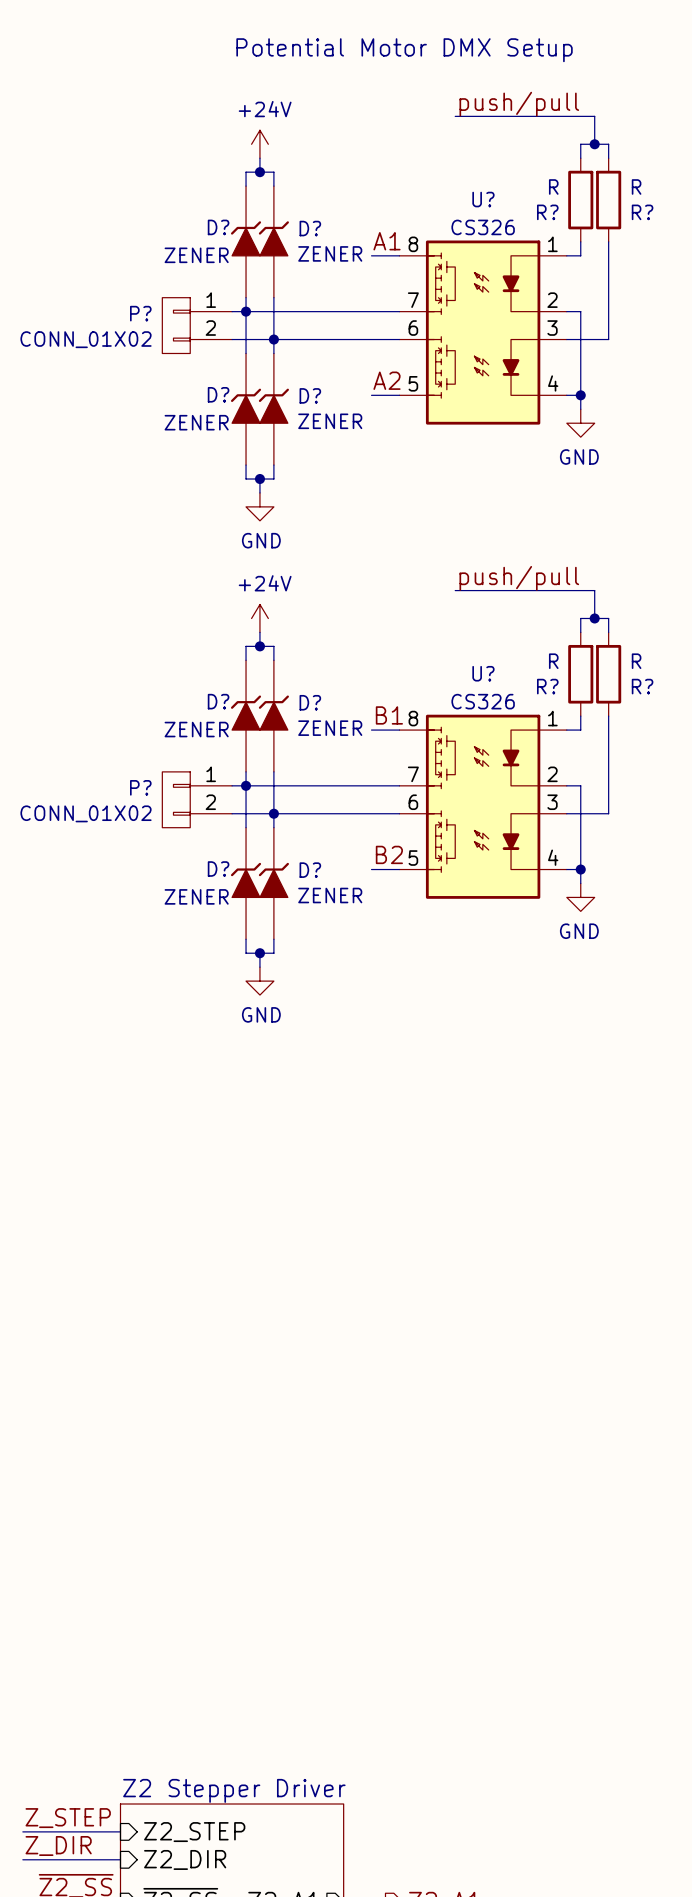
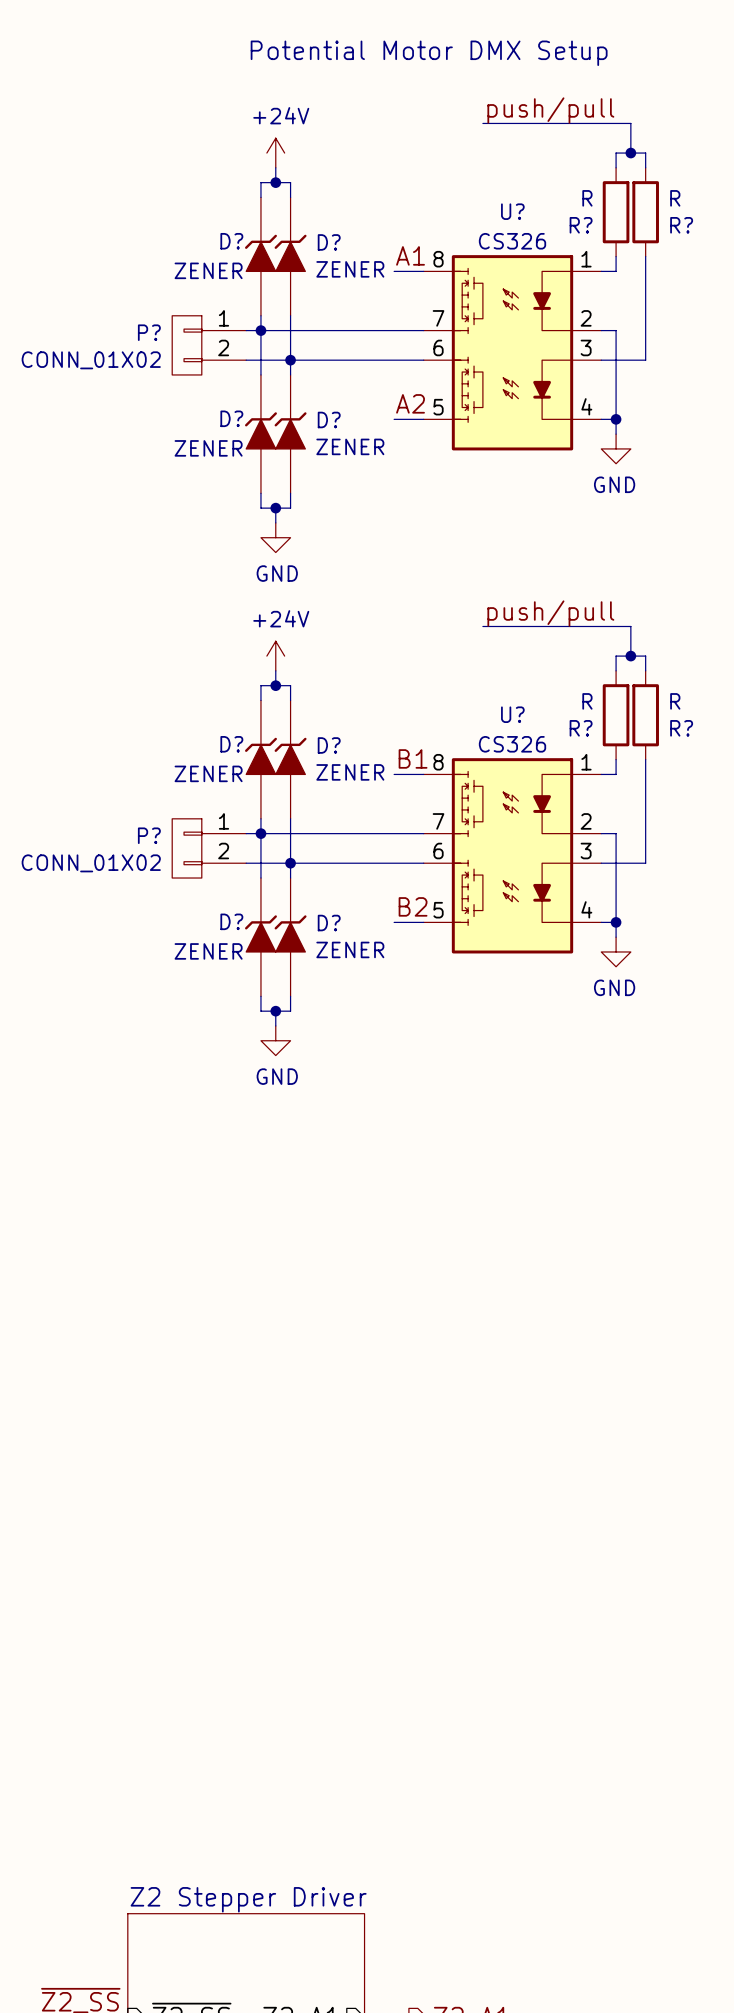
label: Z_STEP (68, 1818) -> none
wire: (22, 1831) (120, 1831) -> none
sheet pin: Z2_STEP (194, 1832) -> none
label: Z_DIR (58, 1845) -> none
wire: (22, 1859) (120, 1859) -> none
sheet pin: Z2_DIR (185, 1859) -> none

